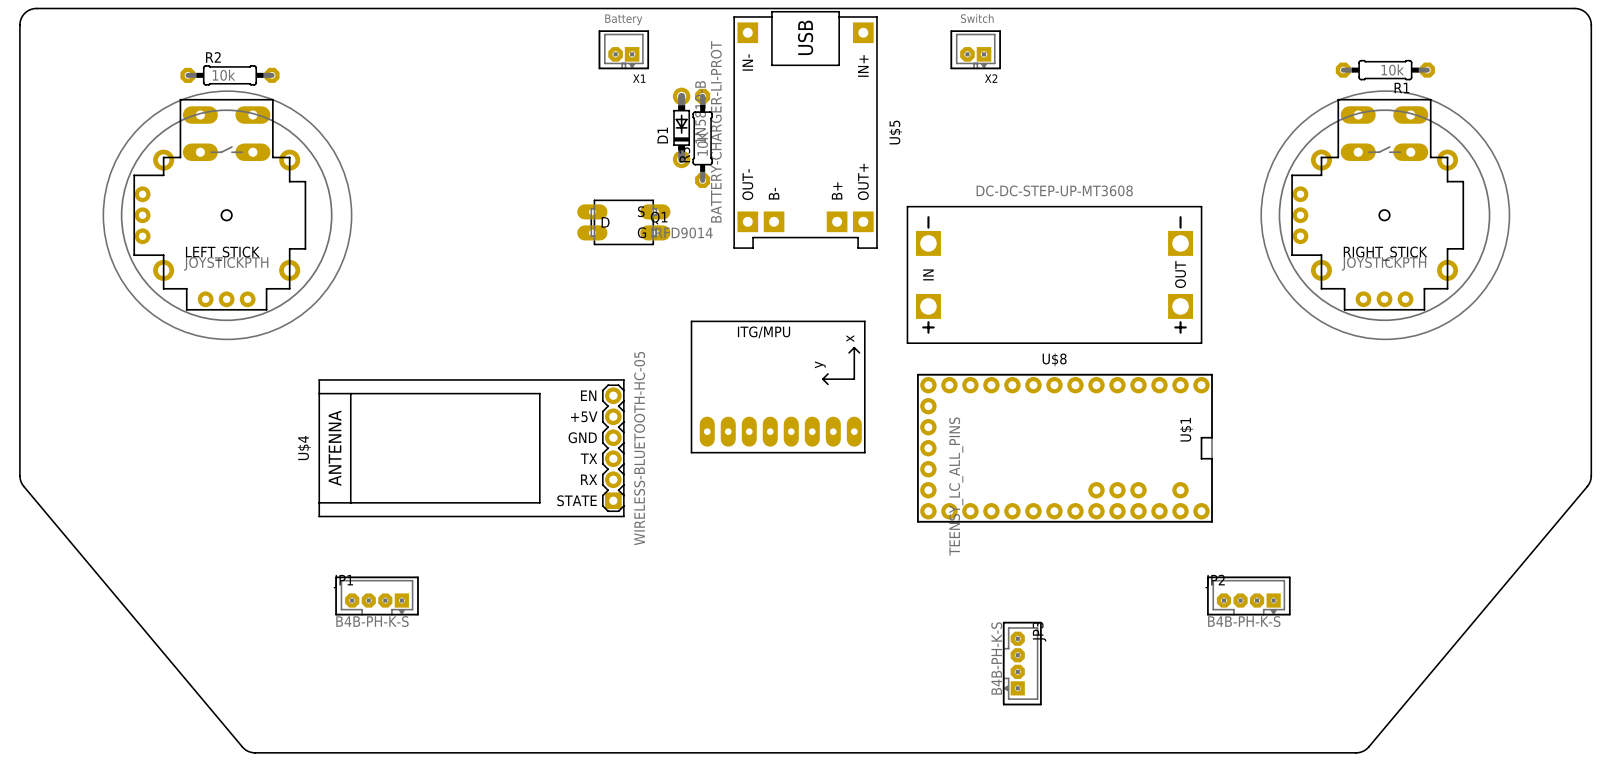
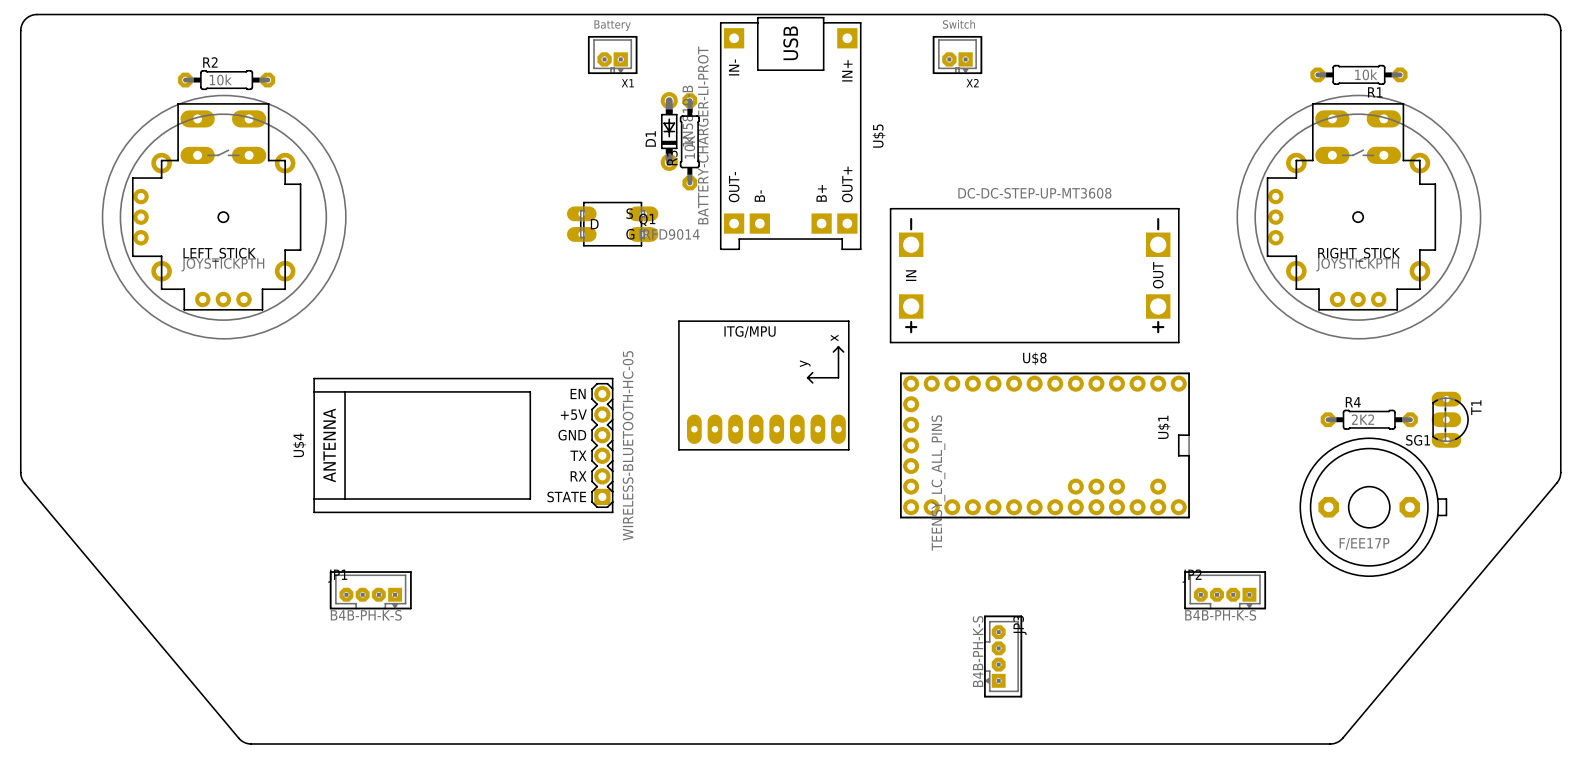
R4: none -> 2K2 (1369, 419)
T1: none -> (1450, 419)
SG1: none -> F/EE17P (1373, 507)

